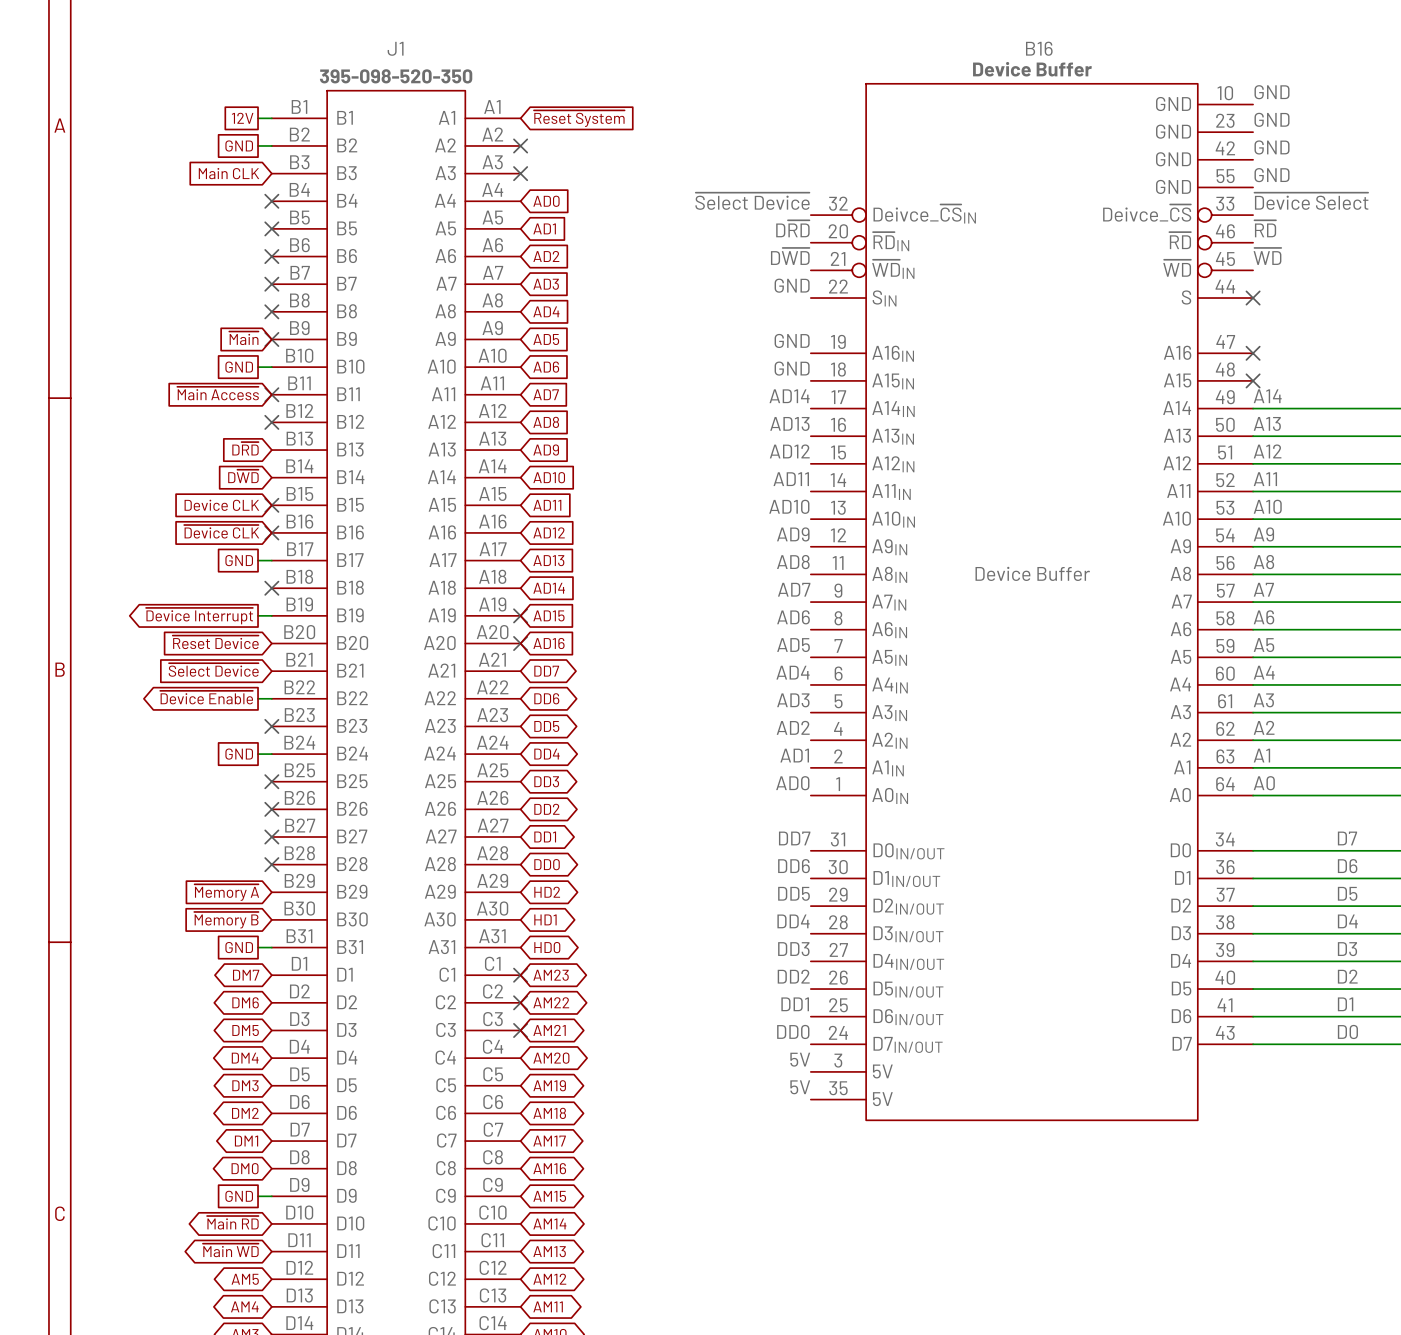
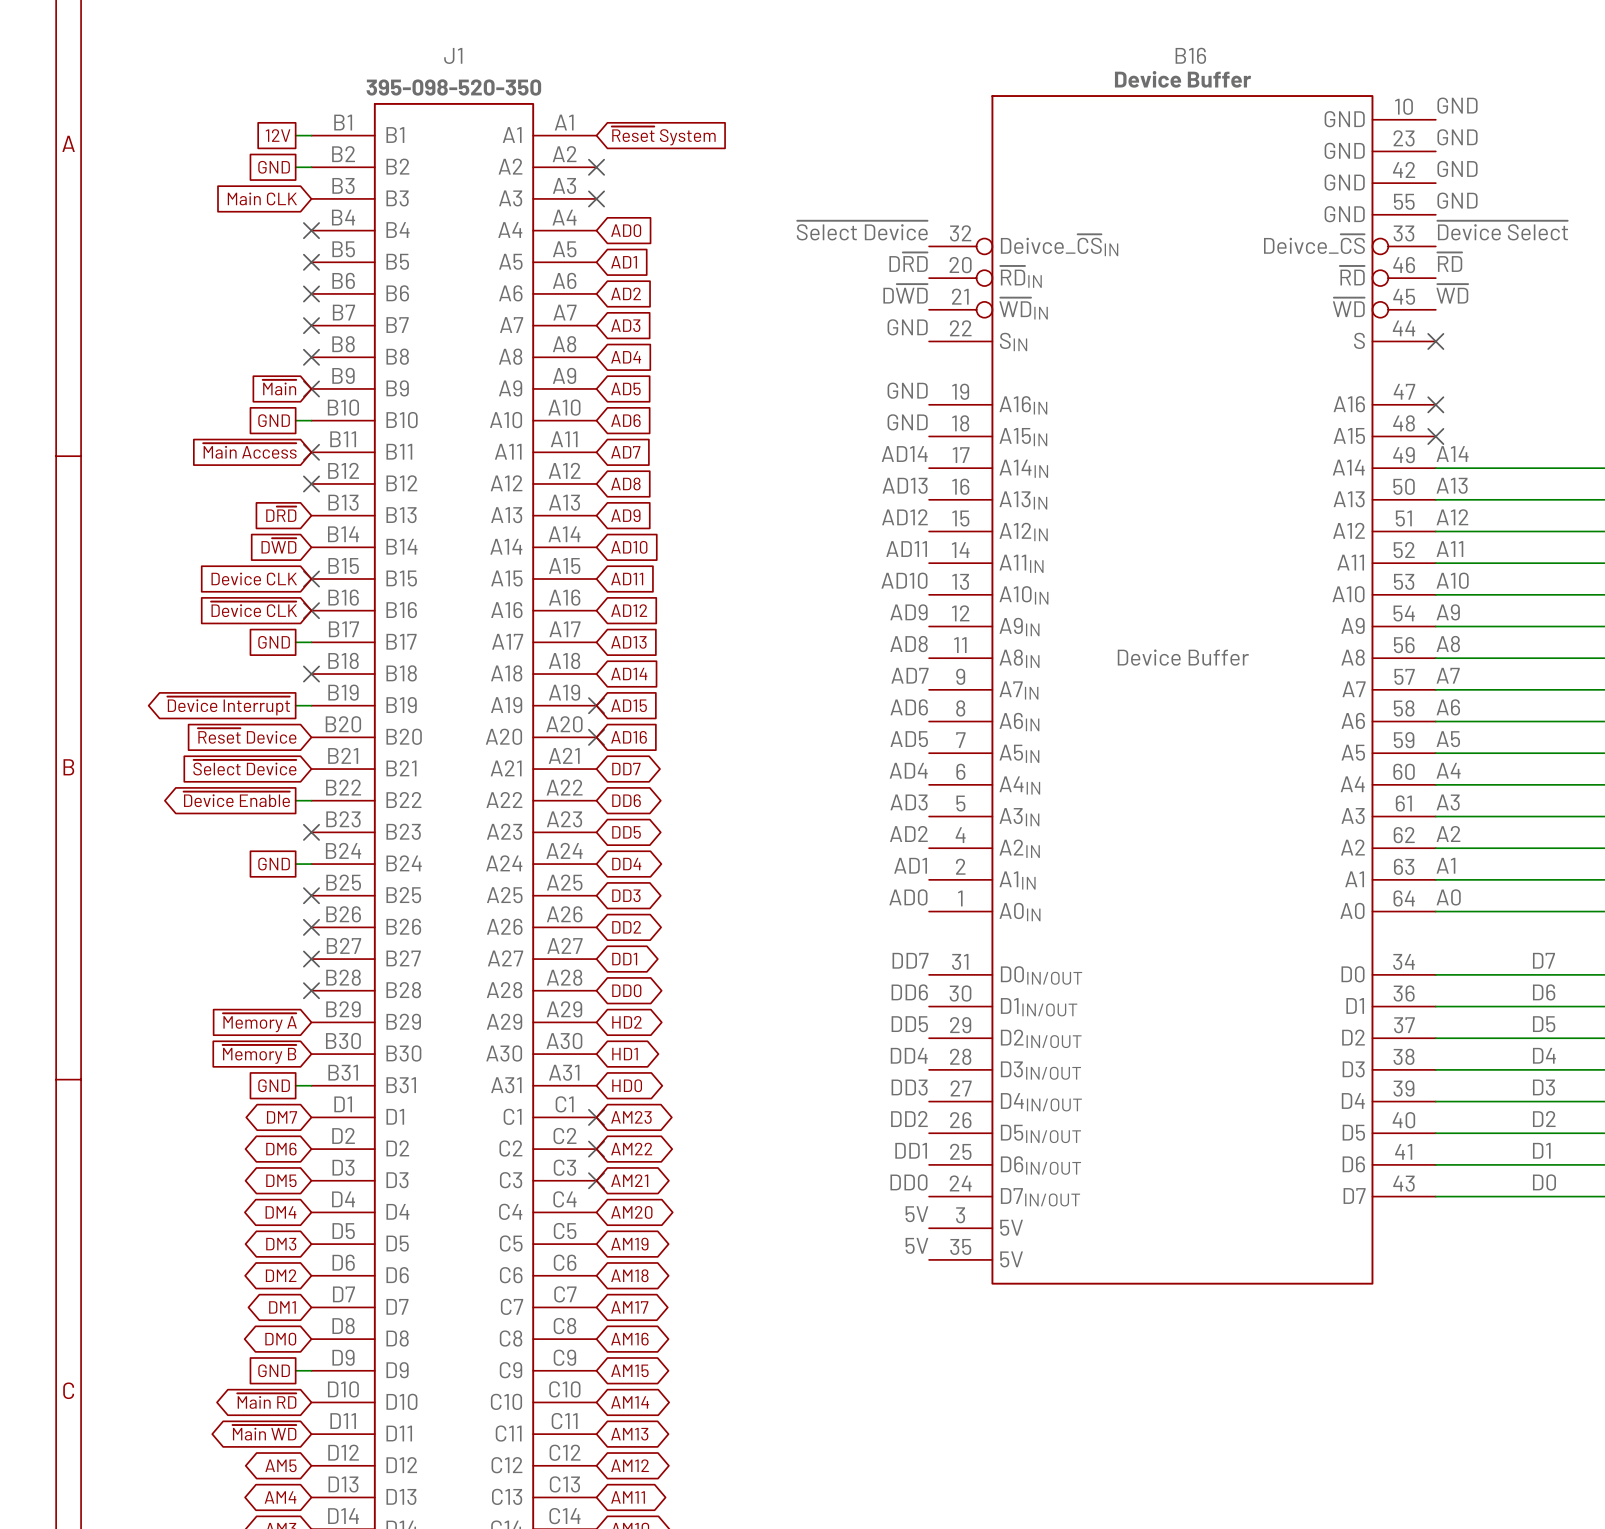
global label: ~{Reset System} (579, 118) -> ~{Reset} System (663, 135)
global label: ~{Reset Device} (215, 642) -> ~{Reset} Device (247, 736)

